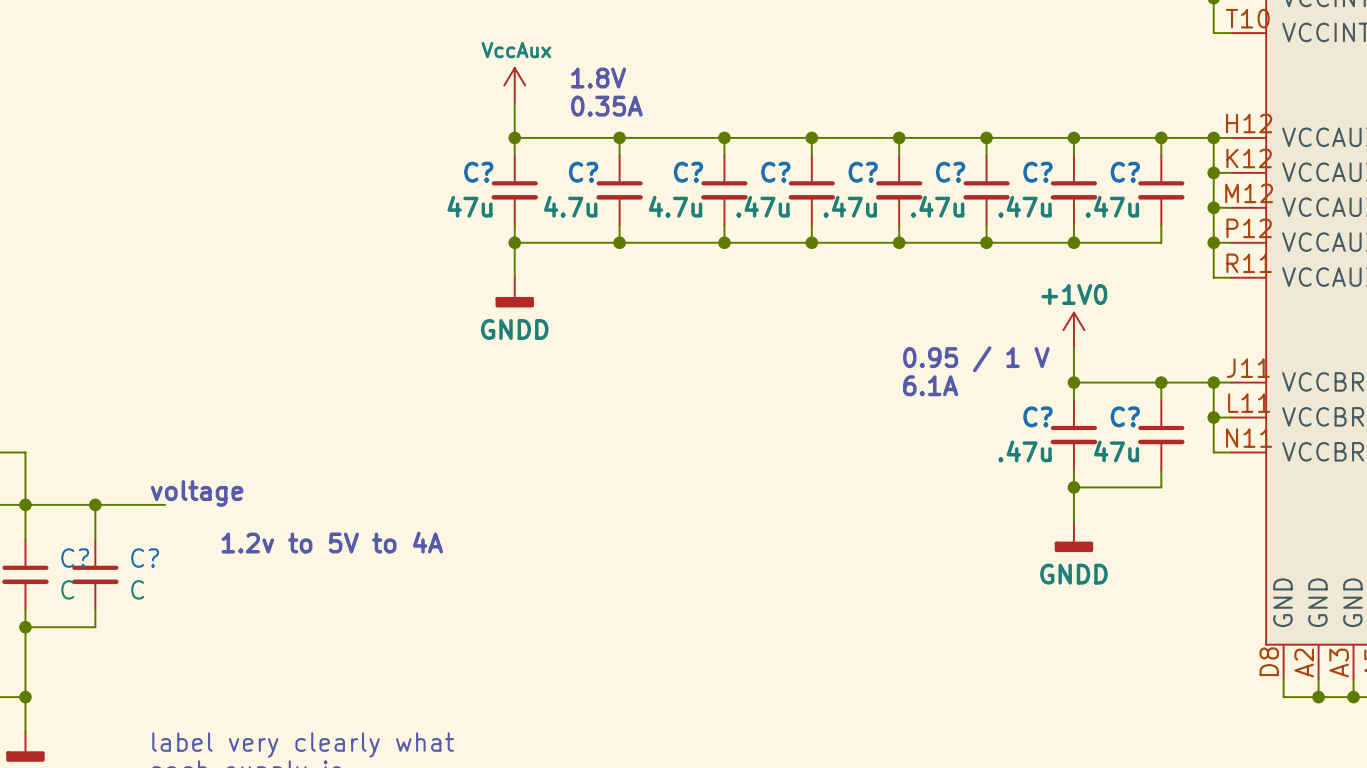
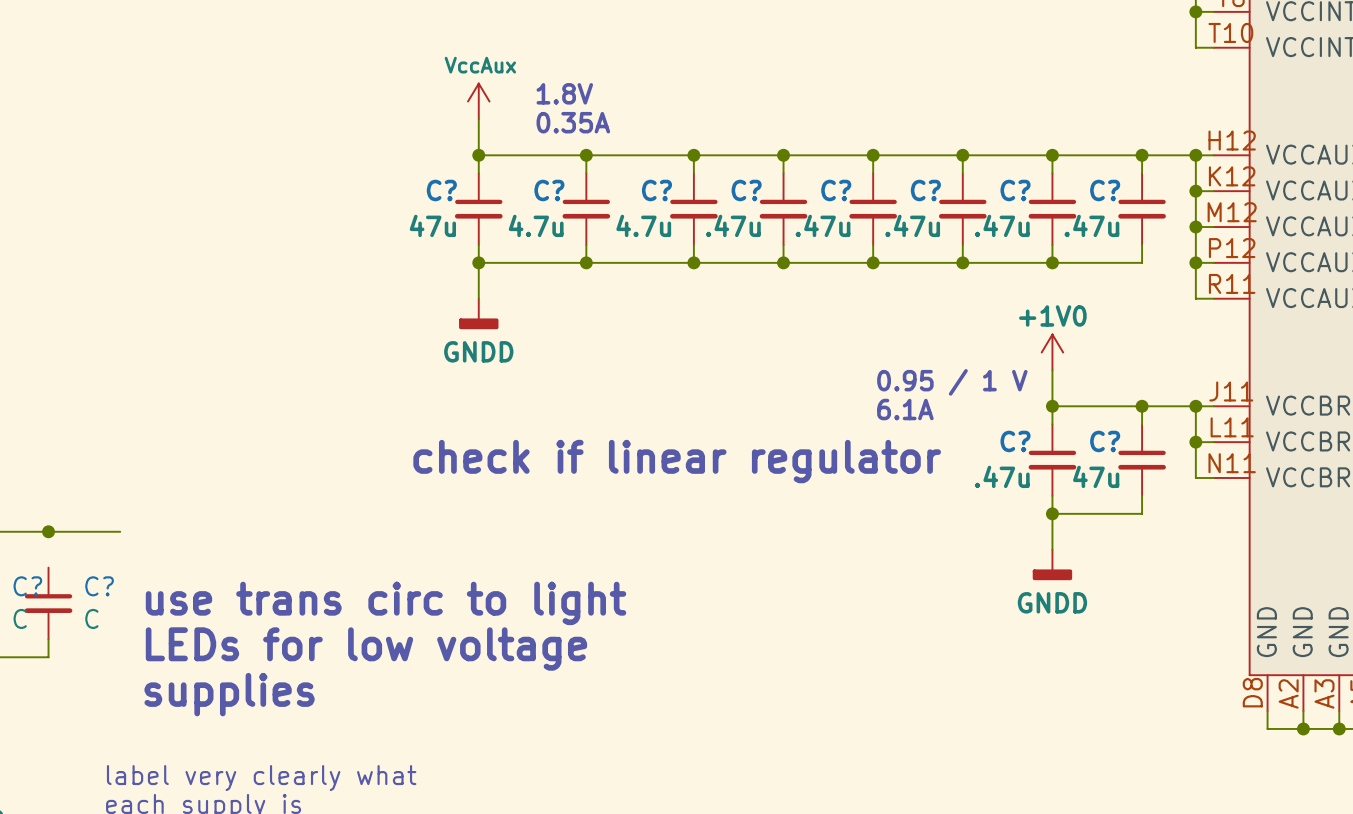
text: none -> check if linear regulator (677, 461)
text: voltage (197, 493) -> none
wire: (95, 504) (95, 539) -> none
text: 1.2v to 5V to 4A (332, 542) -> none
text: none -> use trans circ to light (386, 603)
text: none -> LEDs for low voltage (366, 649)
text: none -> supplies (229, 694)

